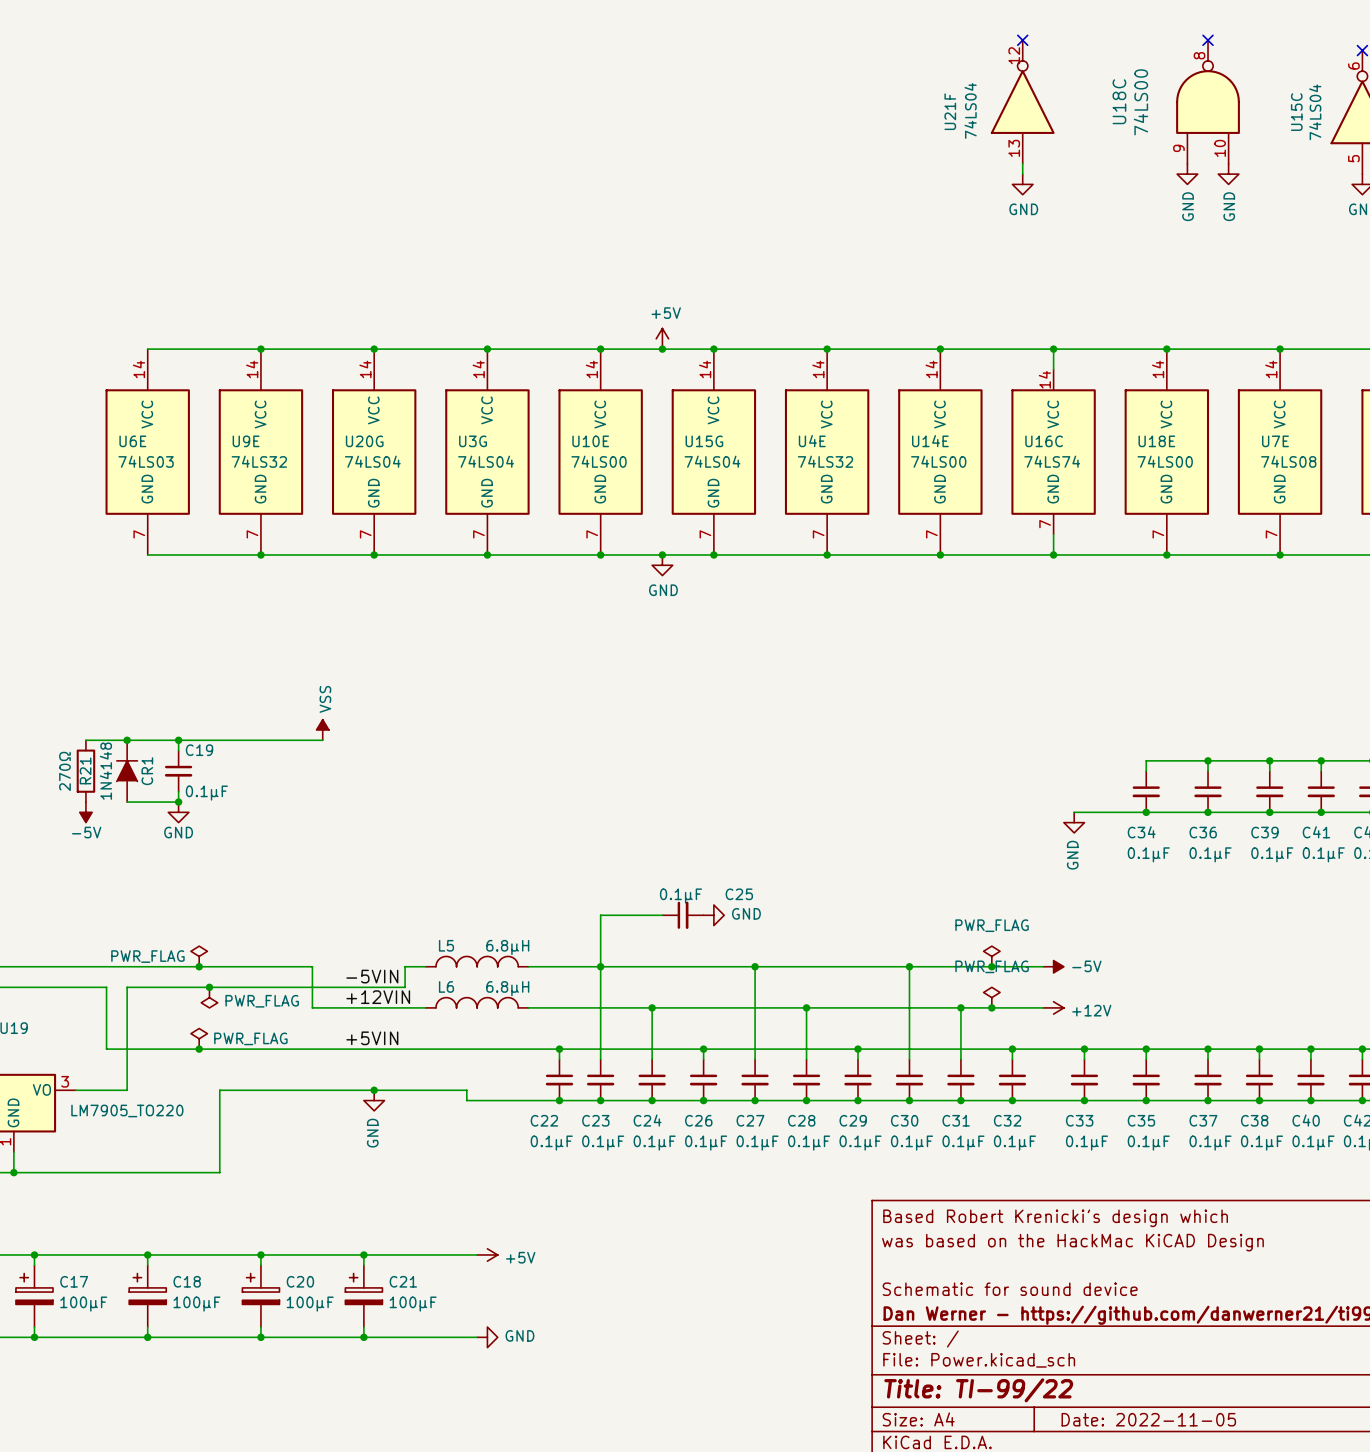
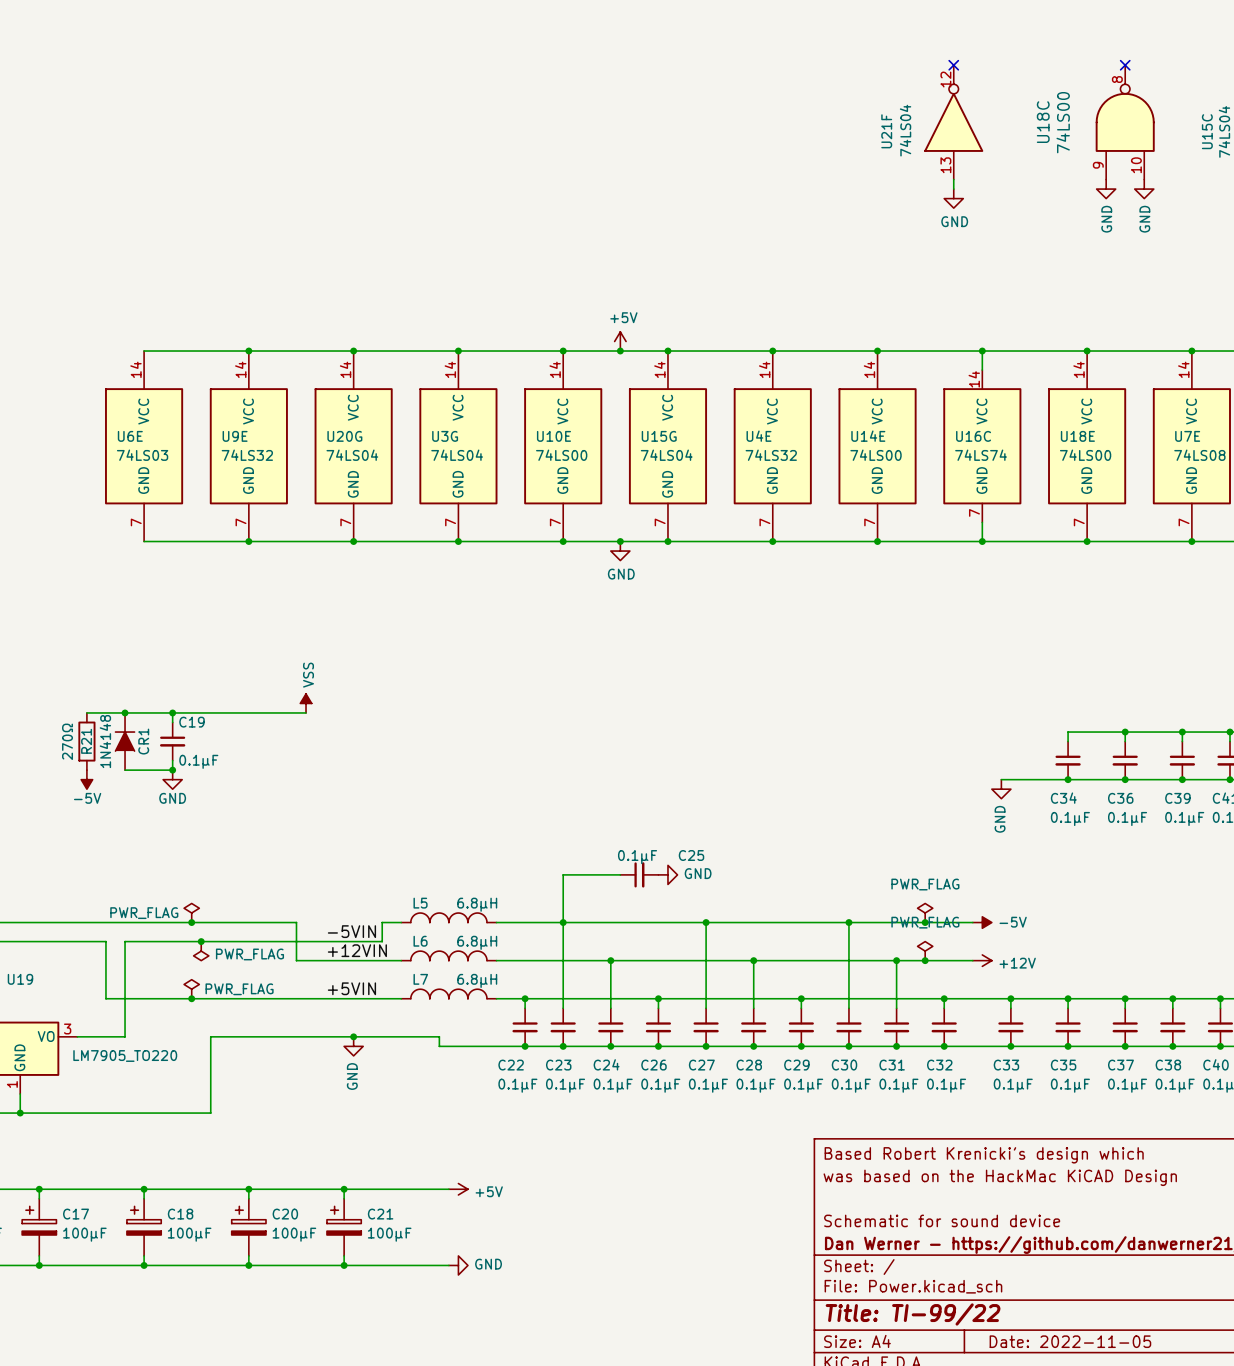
L7: none -> 6.8µH (448, 993)
wire: (425, 1049) (528, 1049) -> none

